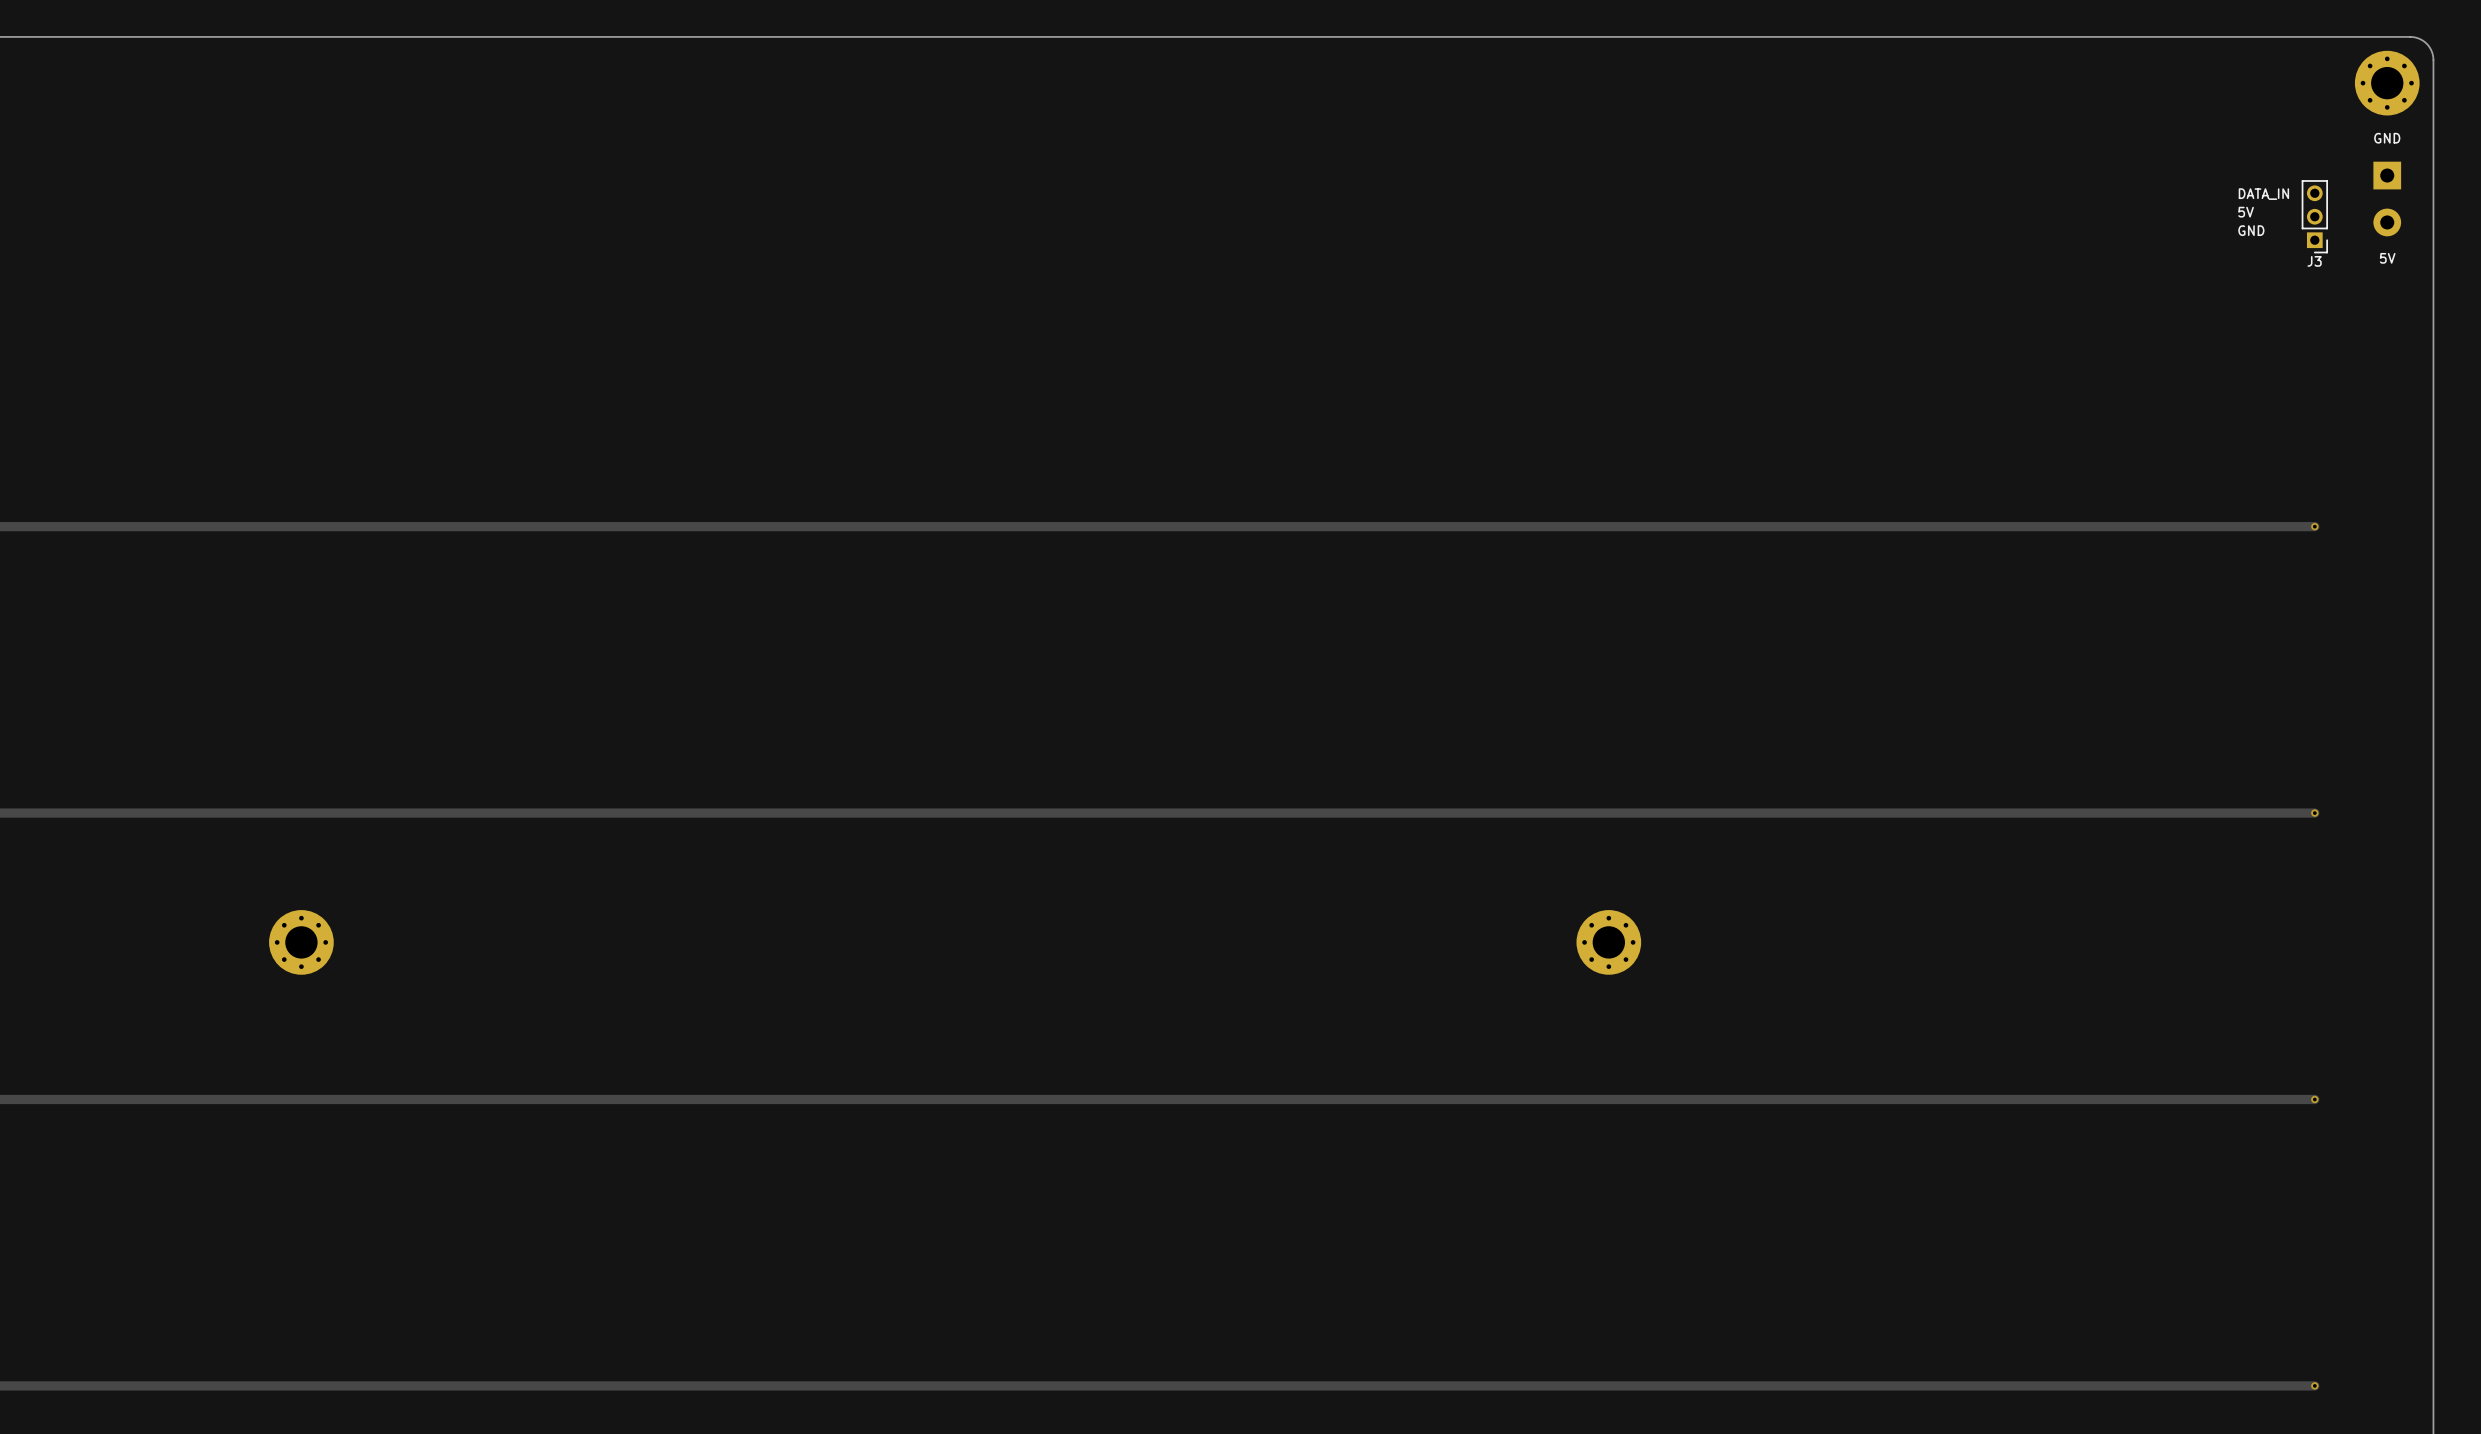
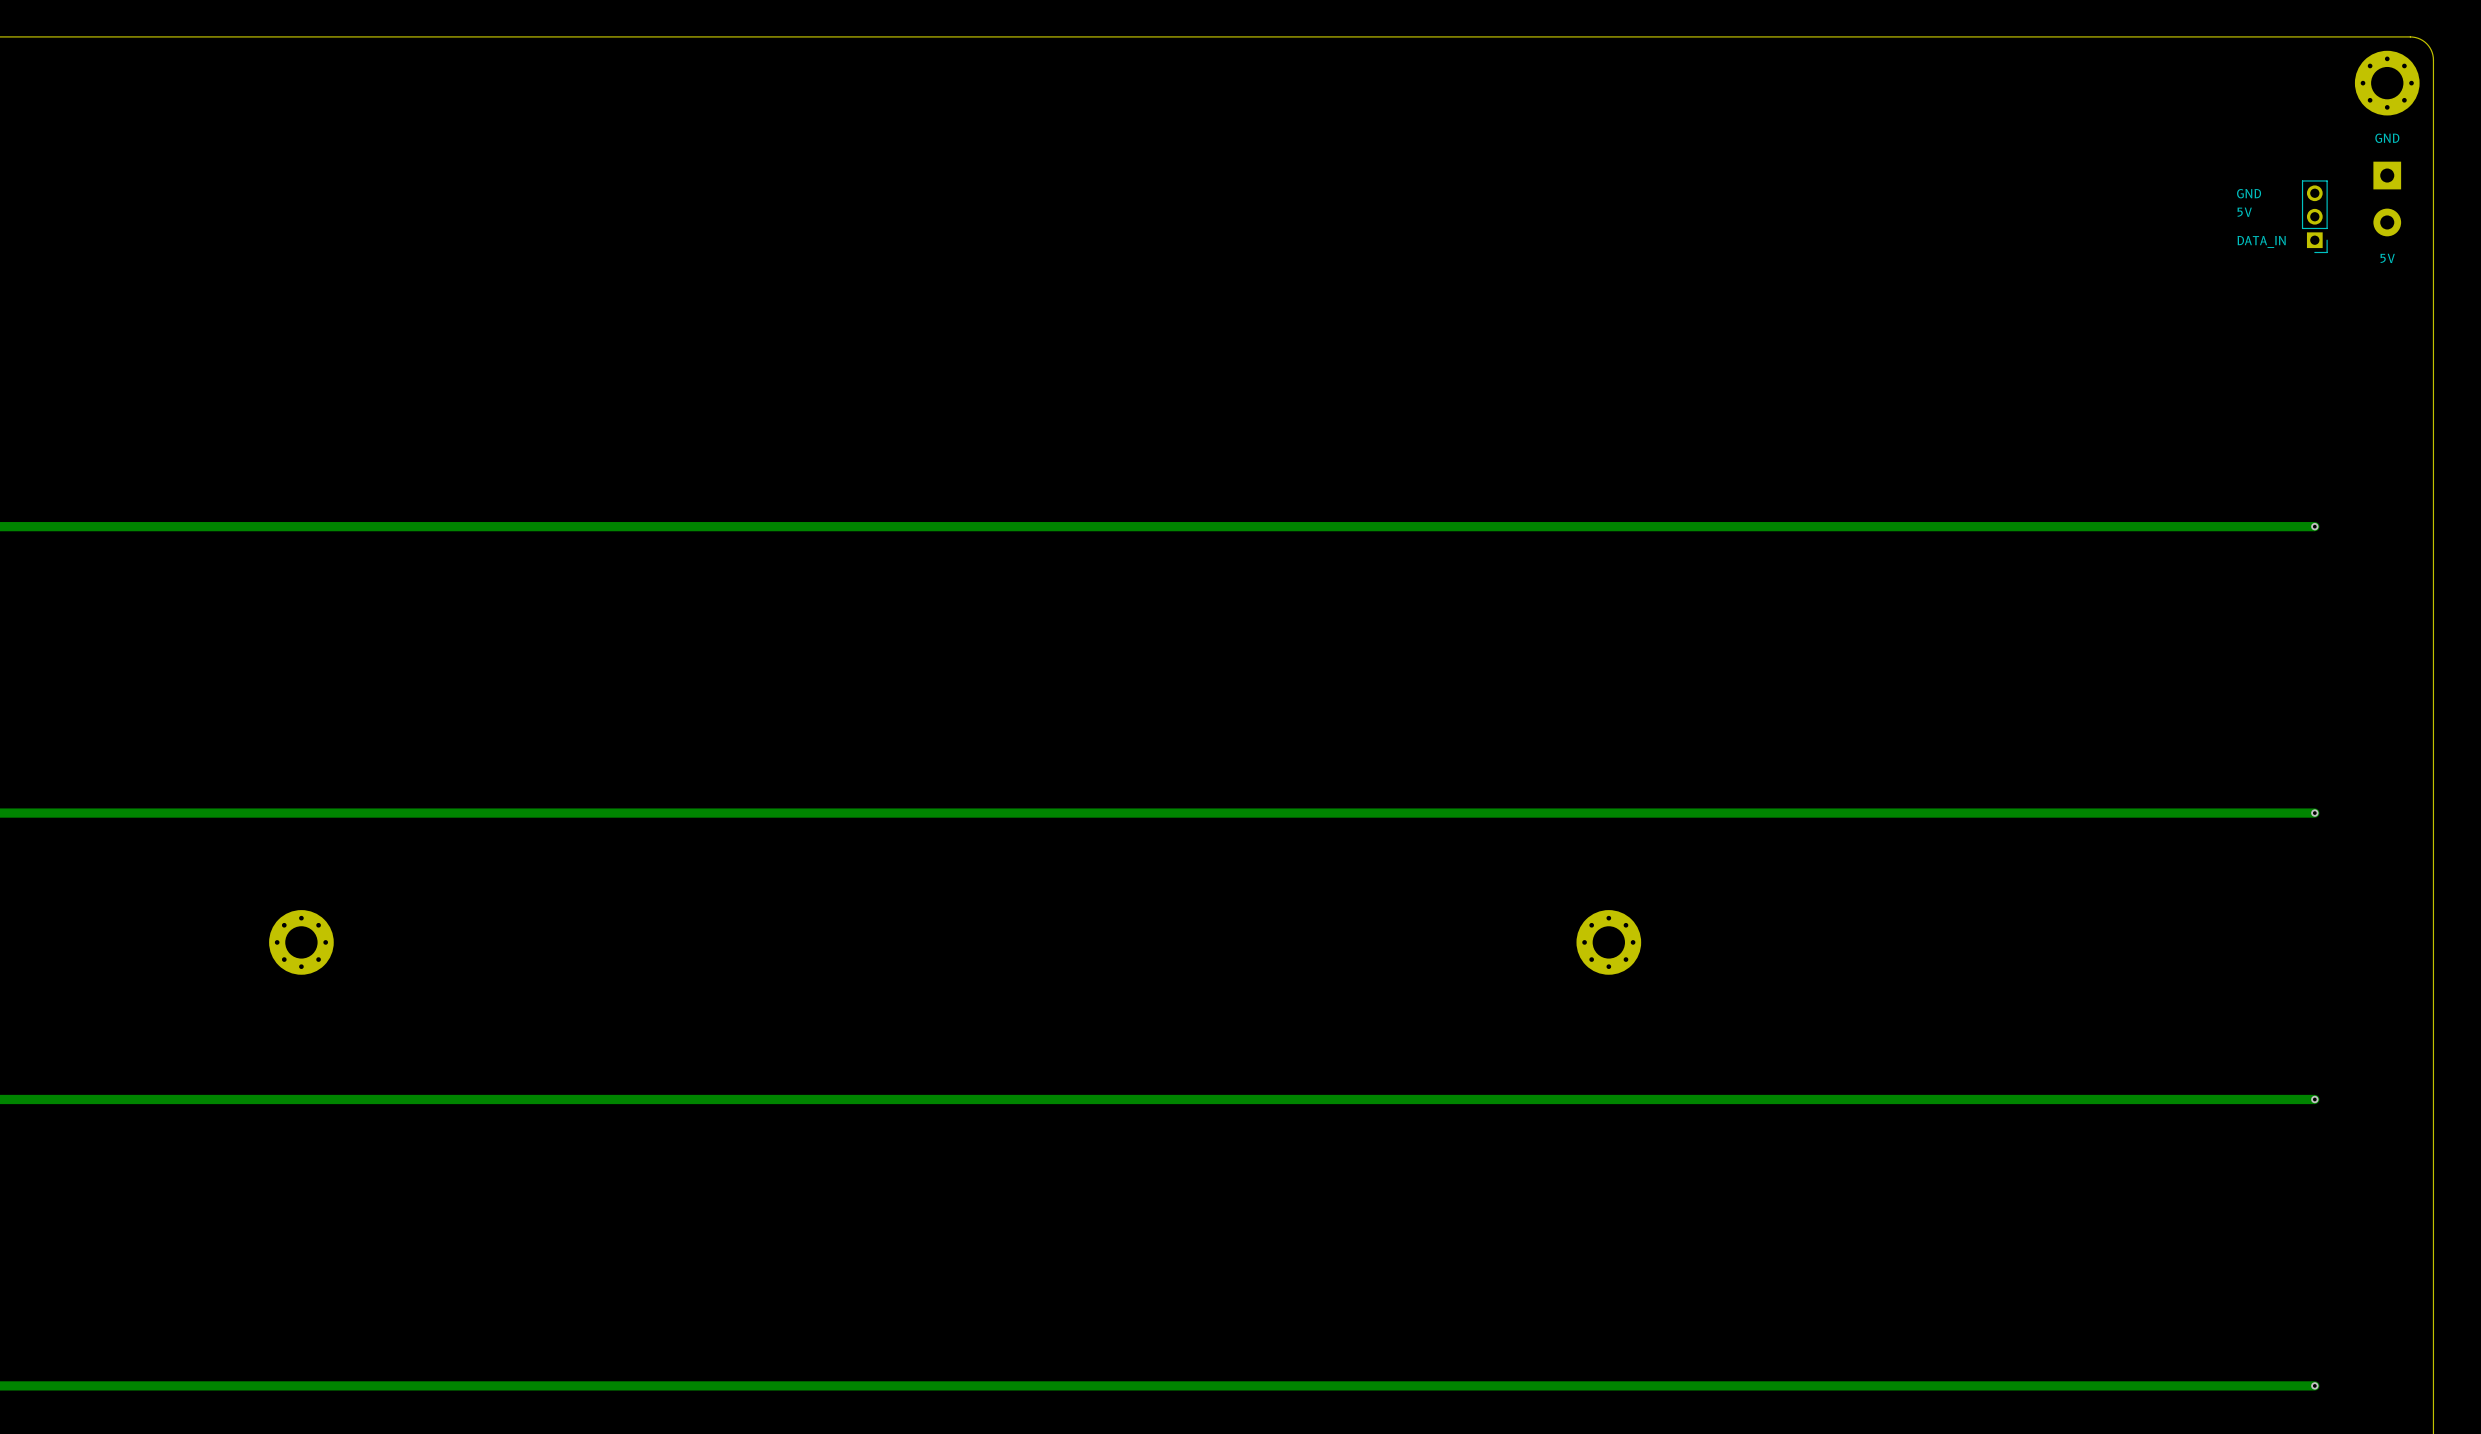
text: DATA_IN (2263, 194) -> GND (2249, 193)
text: GND (2251, 230) -> none
text: none -> DATA_IN (2261, 241)
J3 name: J3 (2314, 261) -> none

